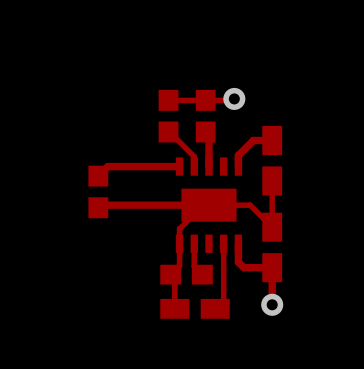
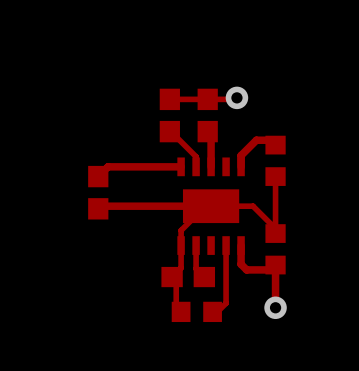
part footprint: [262, 125, 283, 196] -> [265, 135, 286, 186]
part footprint: [262, 212, 283, 283] -> [265, 224, 286, 275]
part footprint: [160, 298, 230, 319] -> [171, 301, 222, 323]

